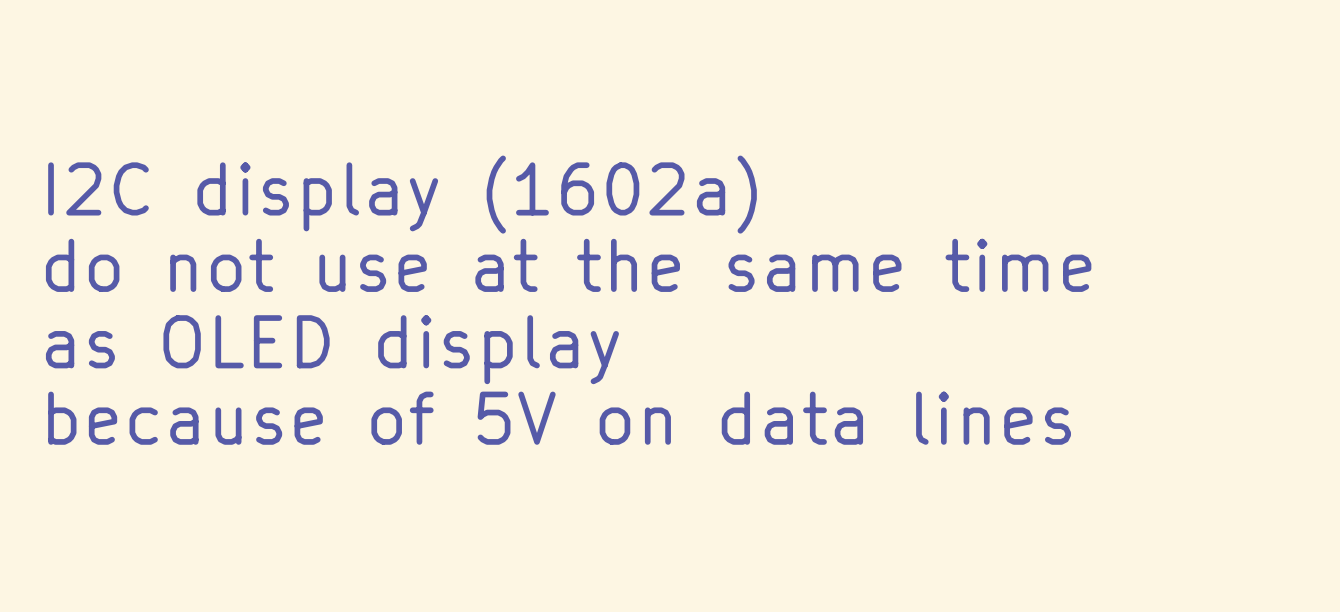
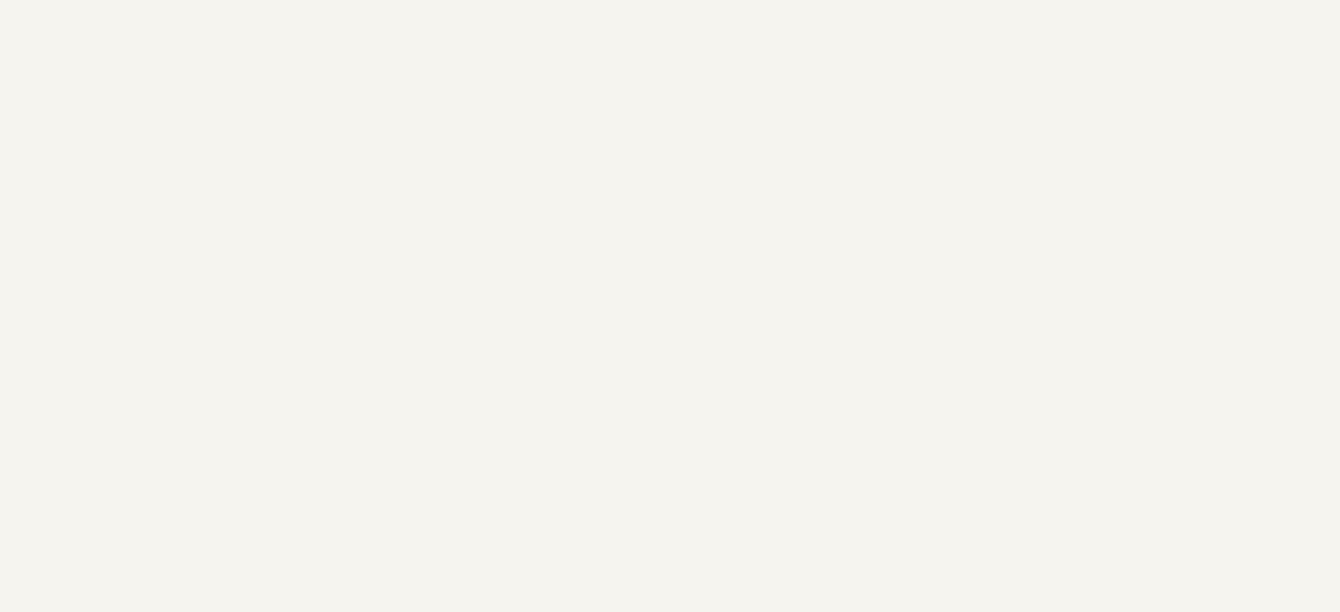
text: I2C display (1602a) (402, 194) -> none
text: do not use at the same time (568, 265) -> none
text: as OLED display (332, 349) -> none
text: because of 5V on data lines (559, 418) -> none

